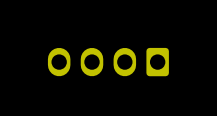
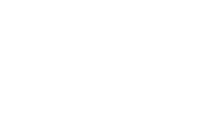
part: (108, 62) -> none

